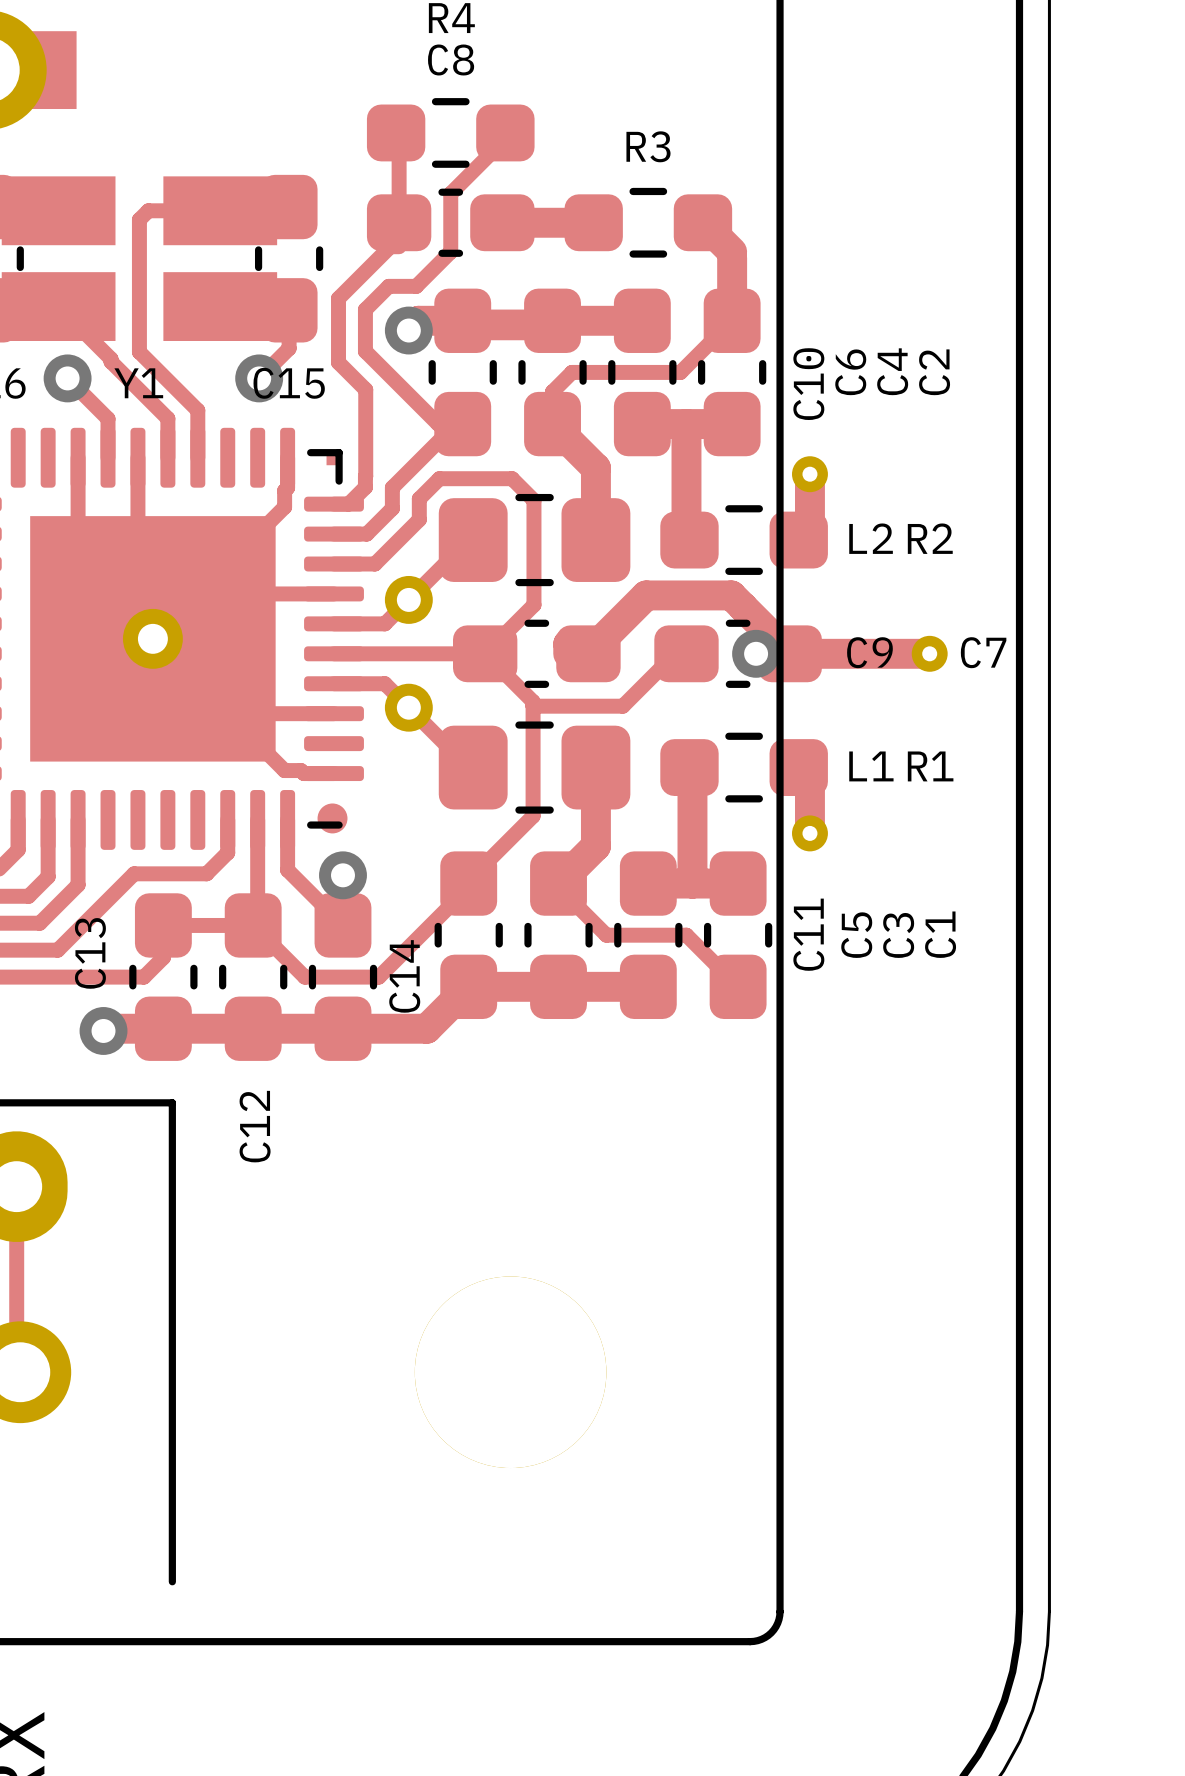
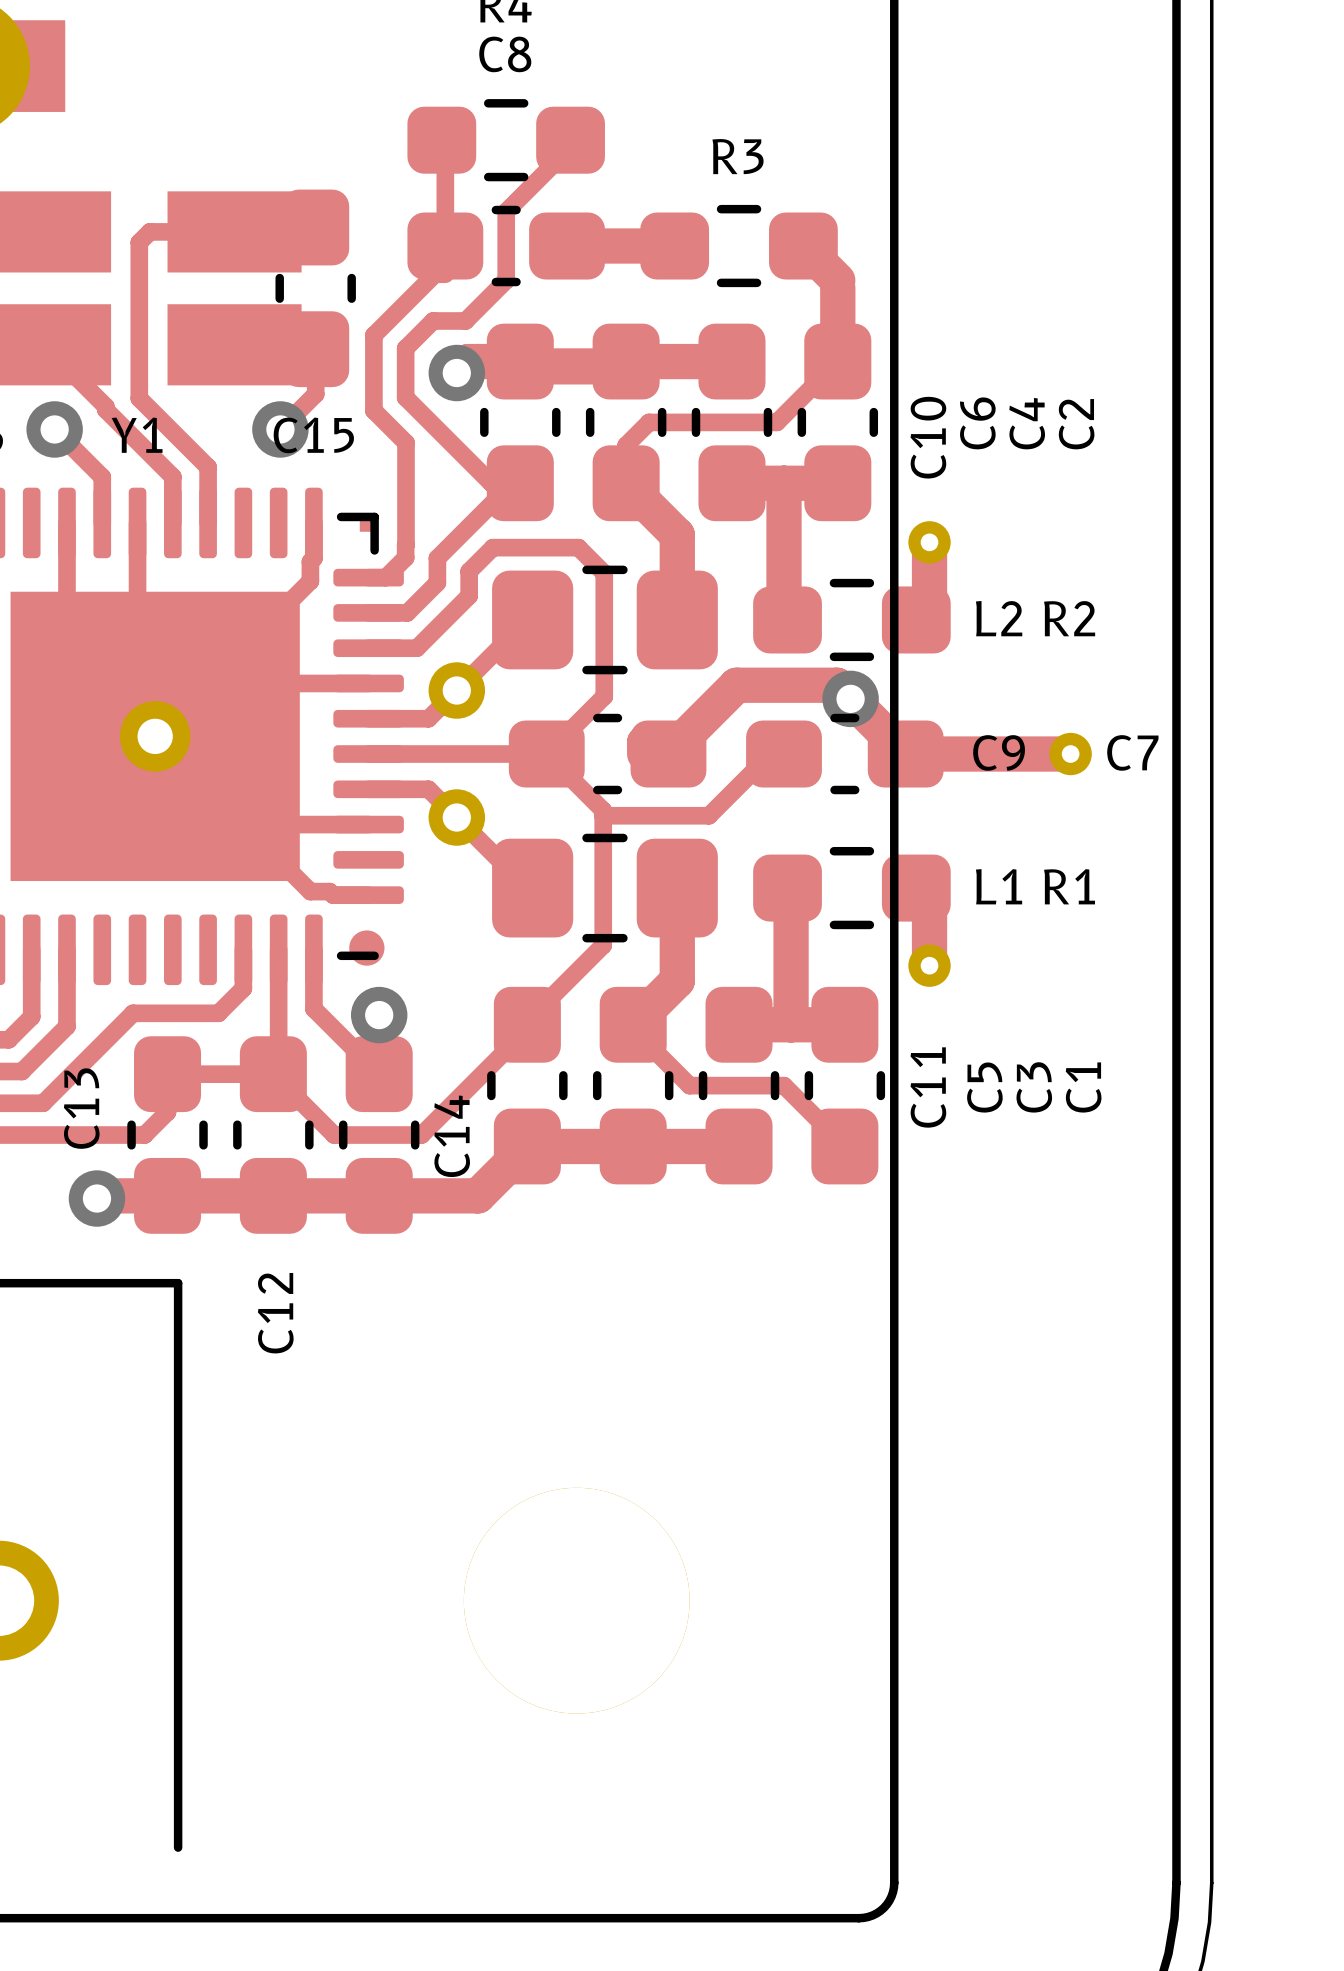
via position: (756, 653) -> (850, 698)

